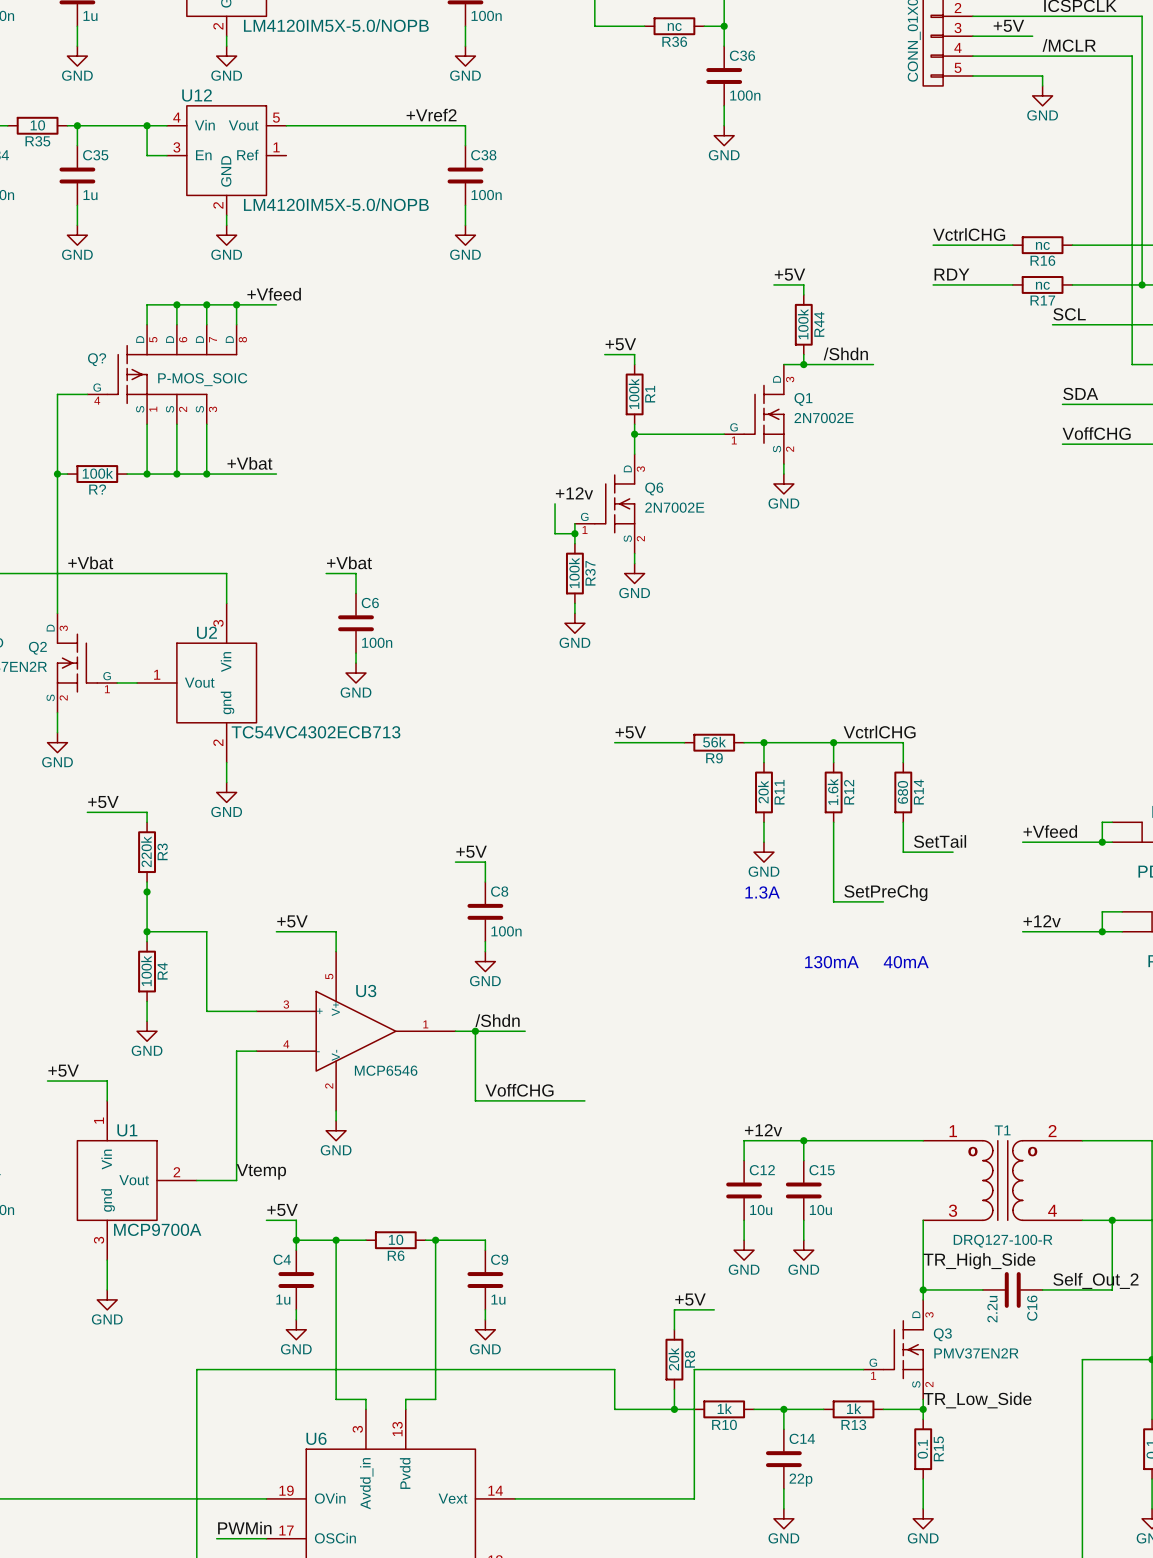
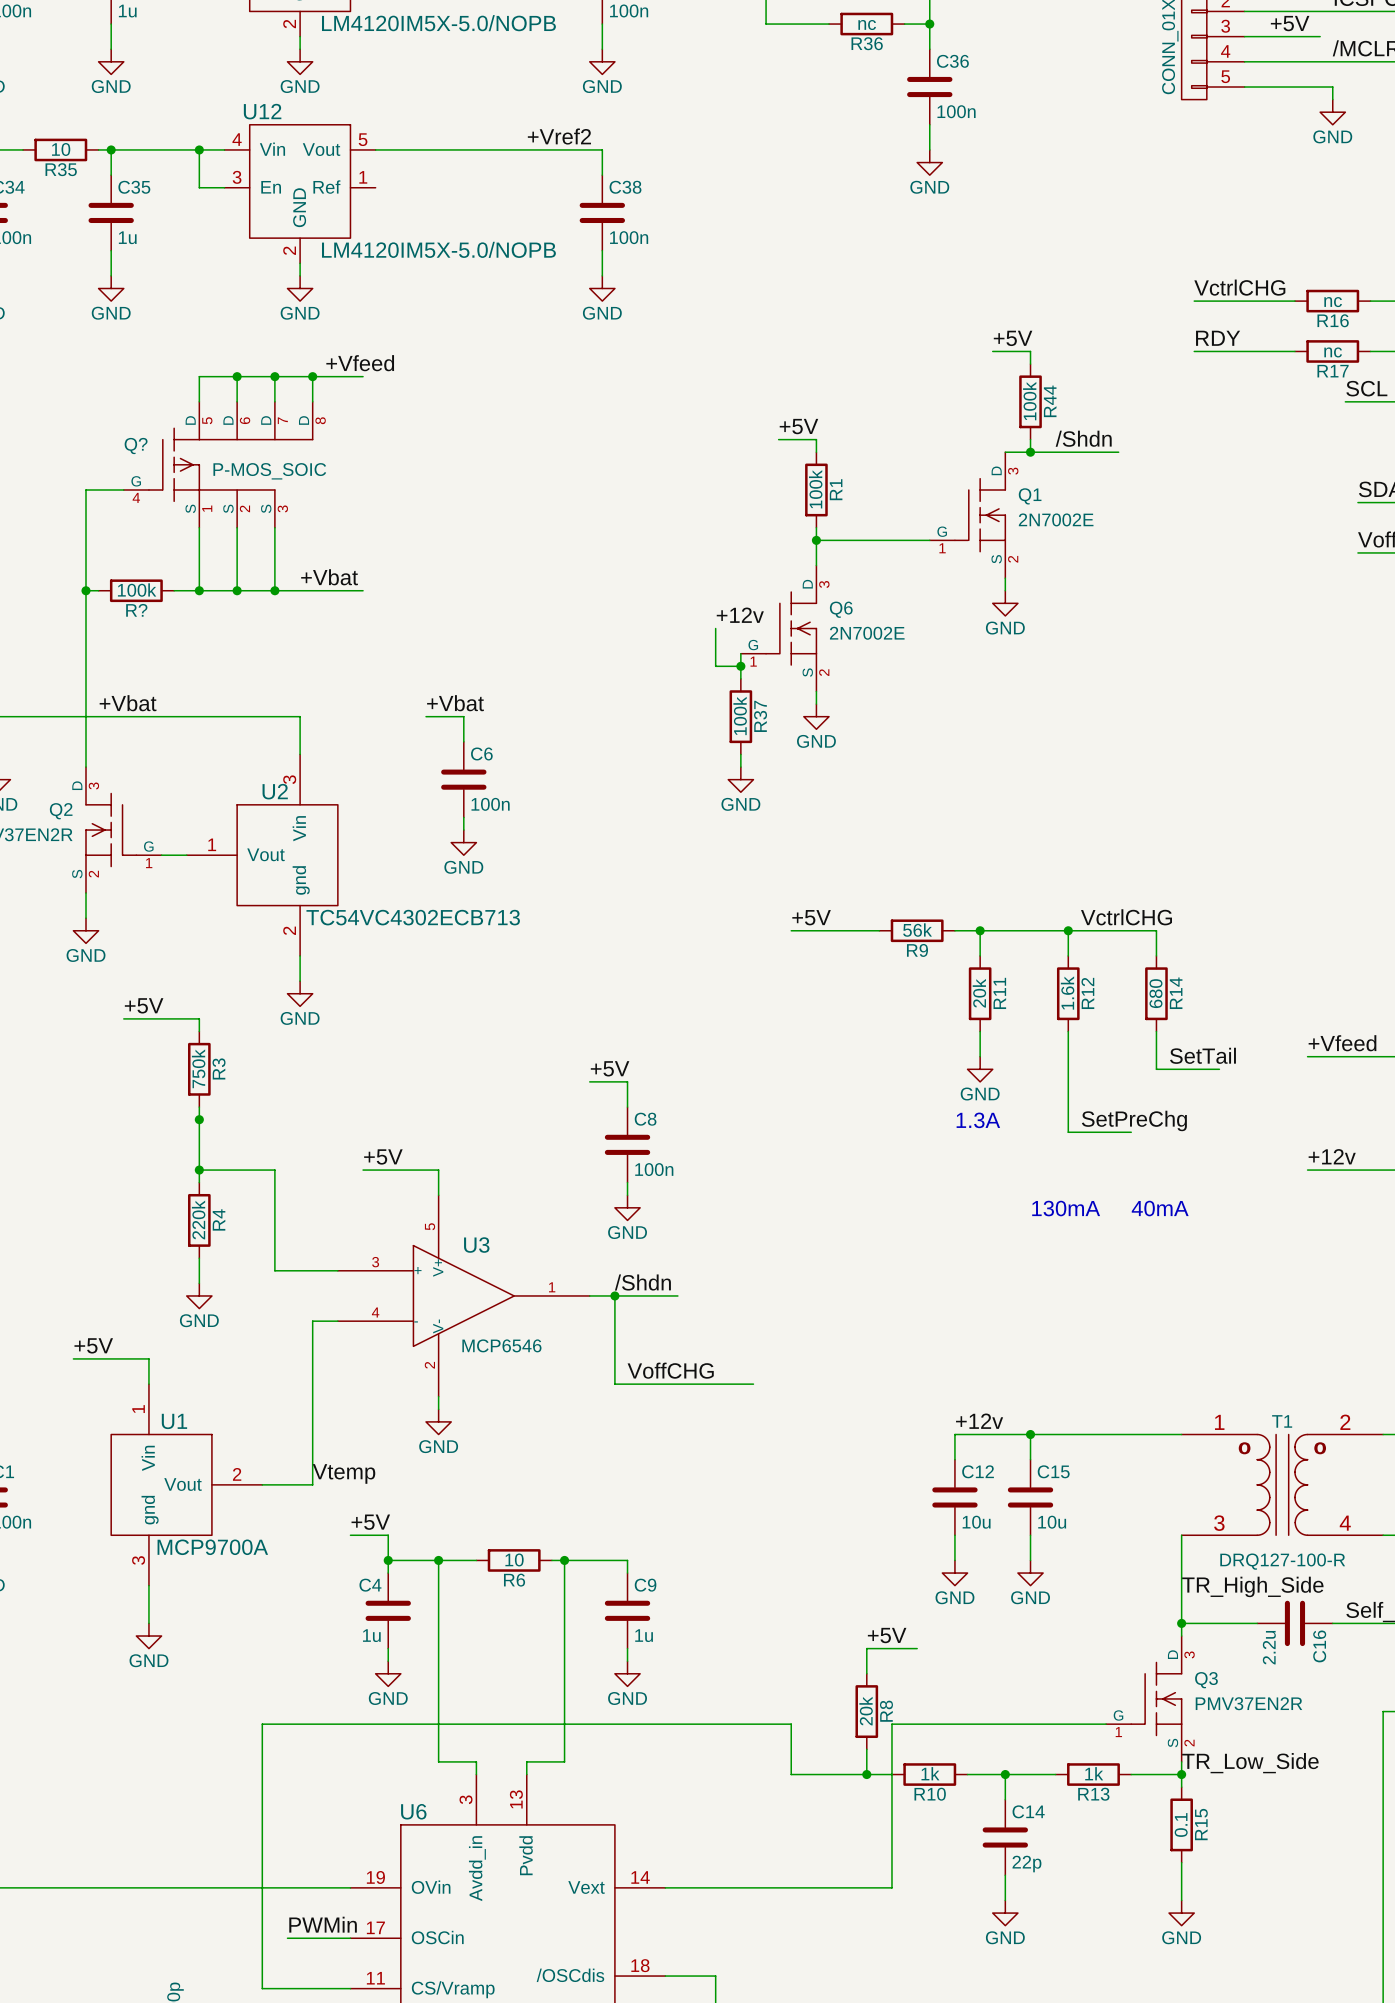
R3 value: 220k (146, 851) -> 750k (198, 1068)
R4 value: 100k (146, 970) -> 220k (198, 1219)

